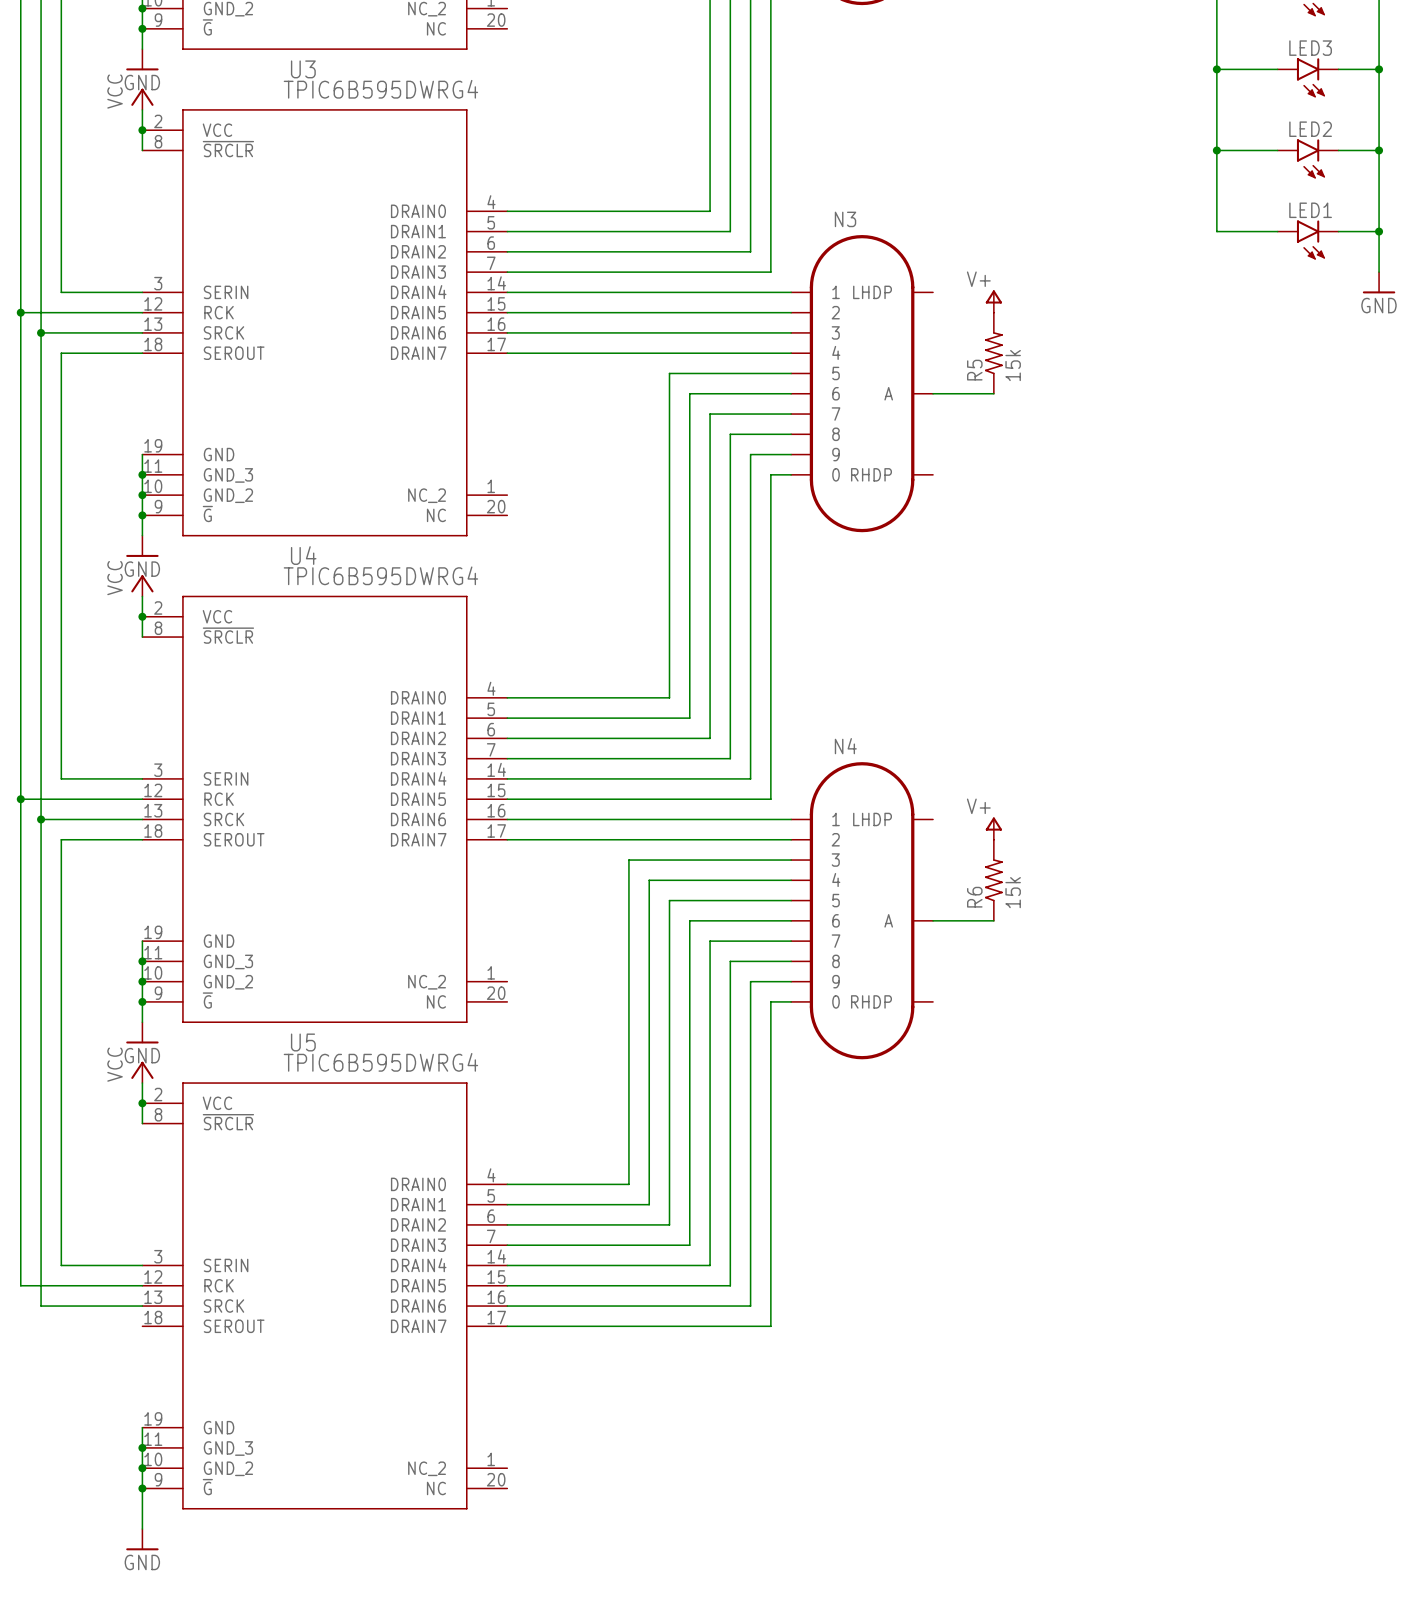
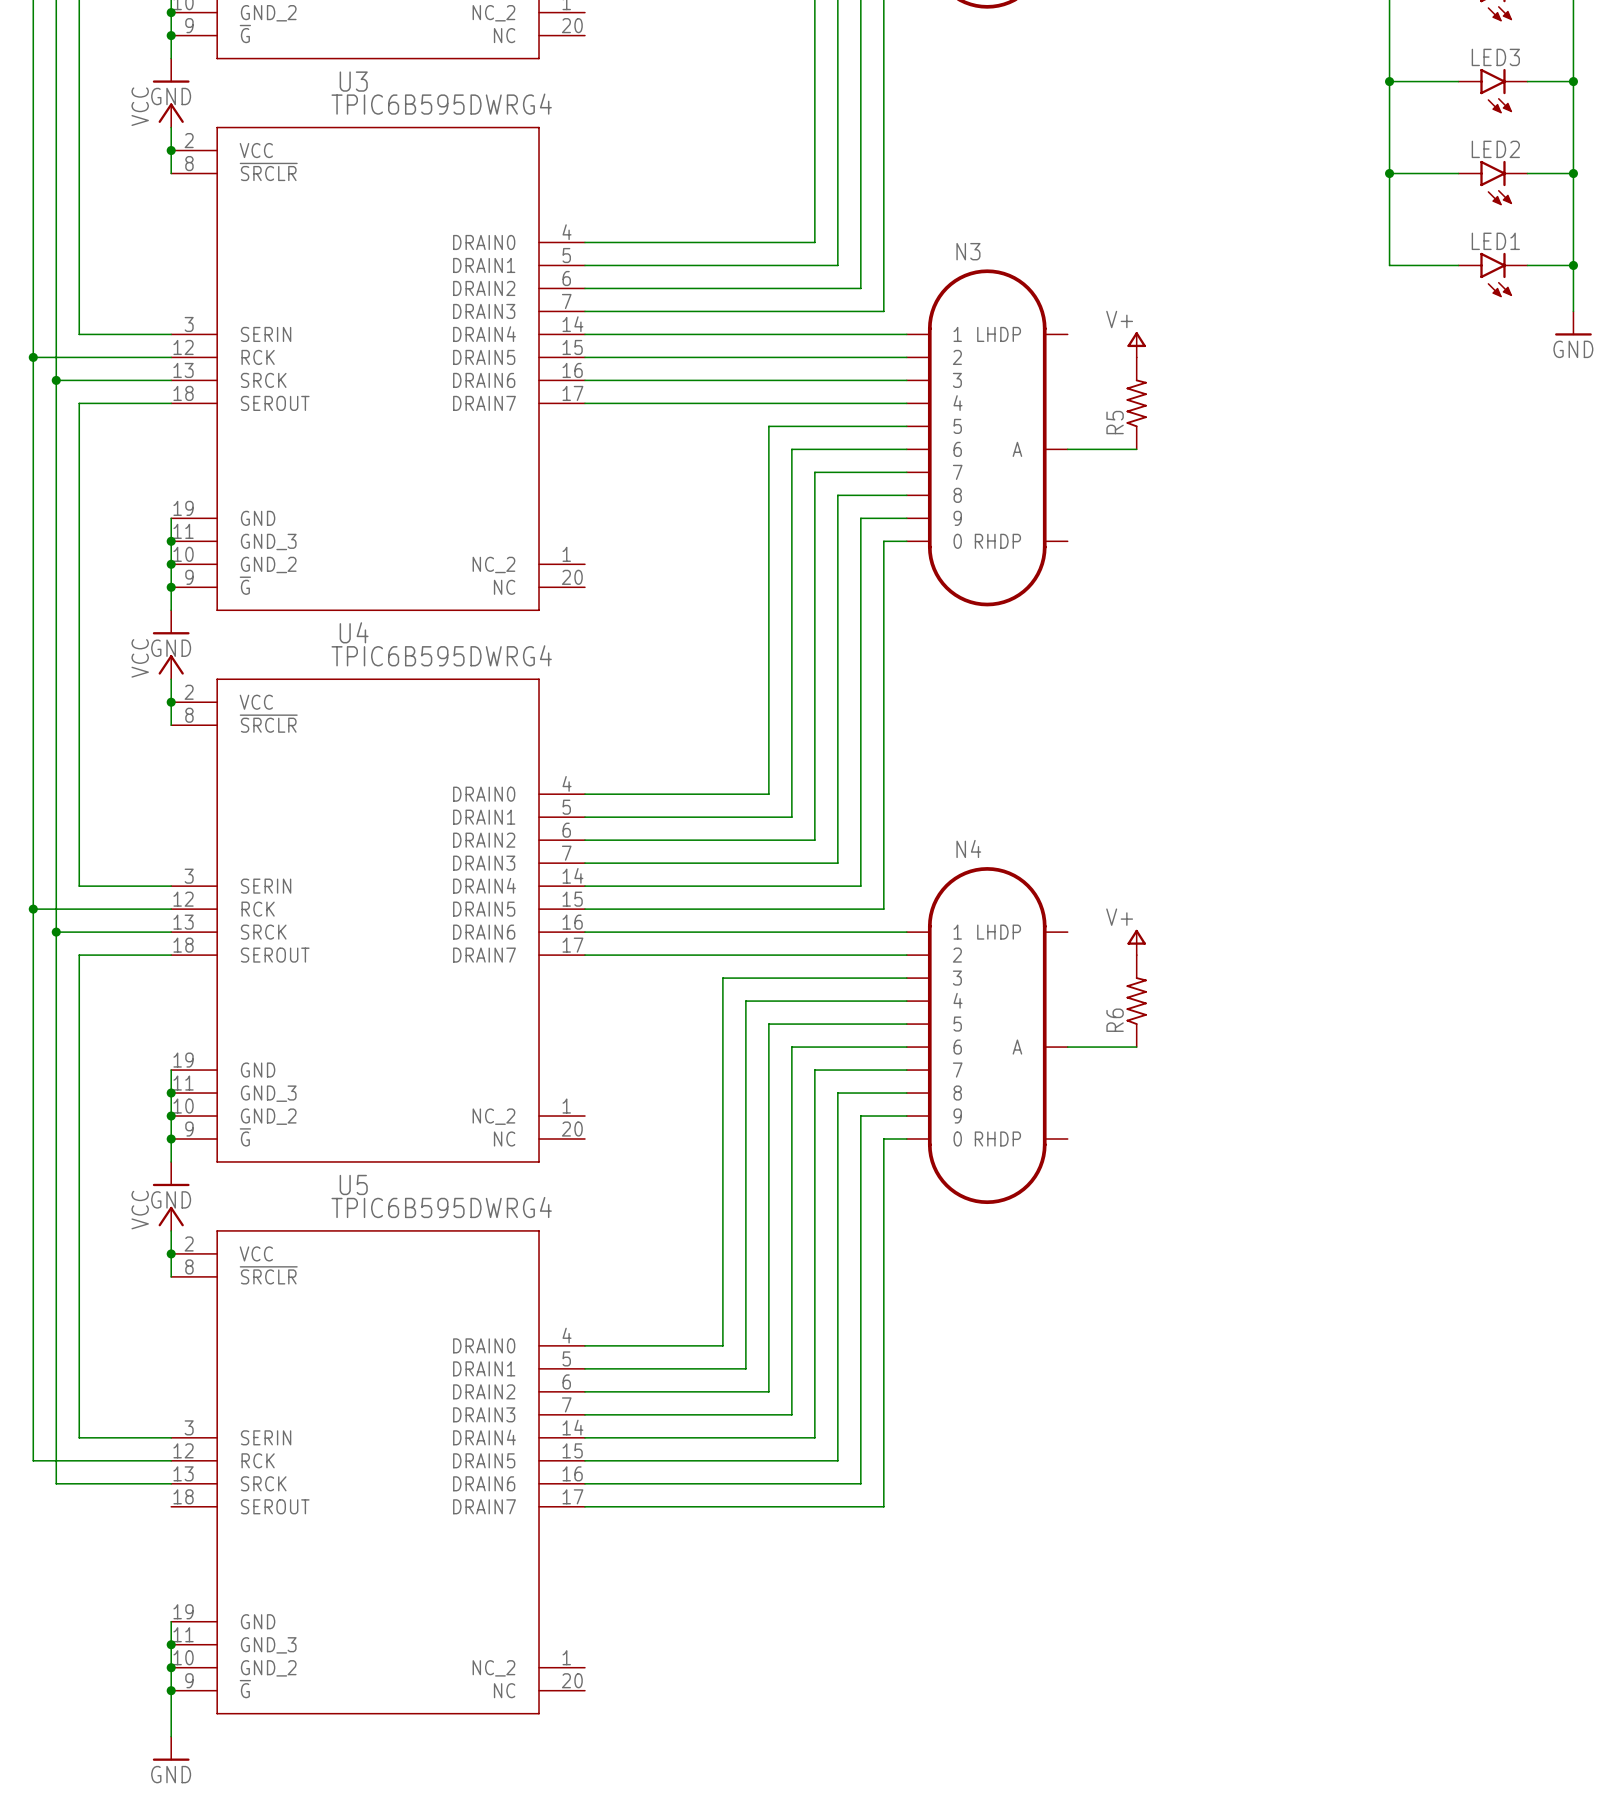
R5 value: 15k (1013, 365) -> none
R6 value: 15k (1013, 892) -> none

